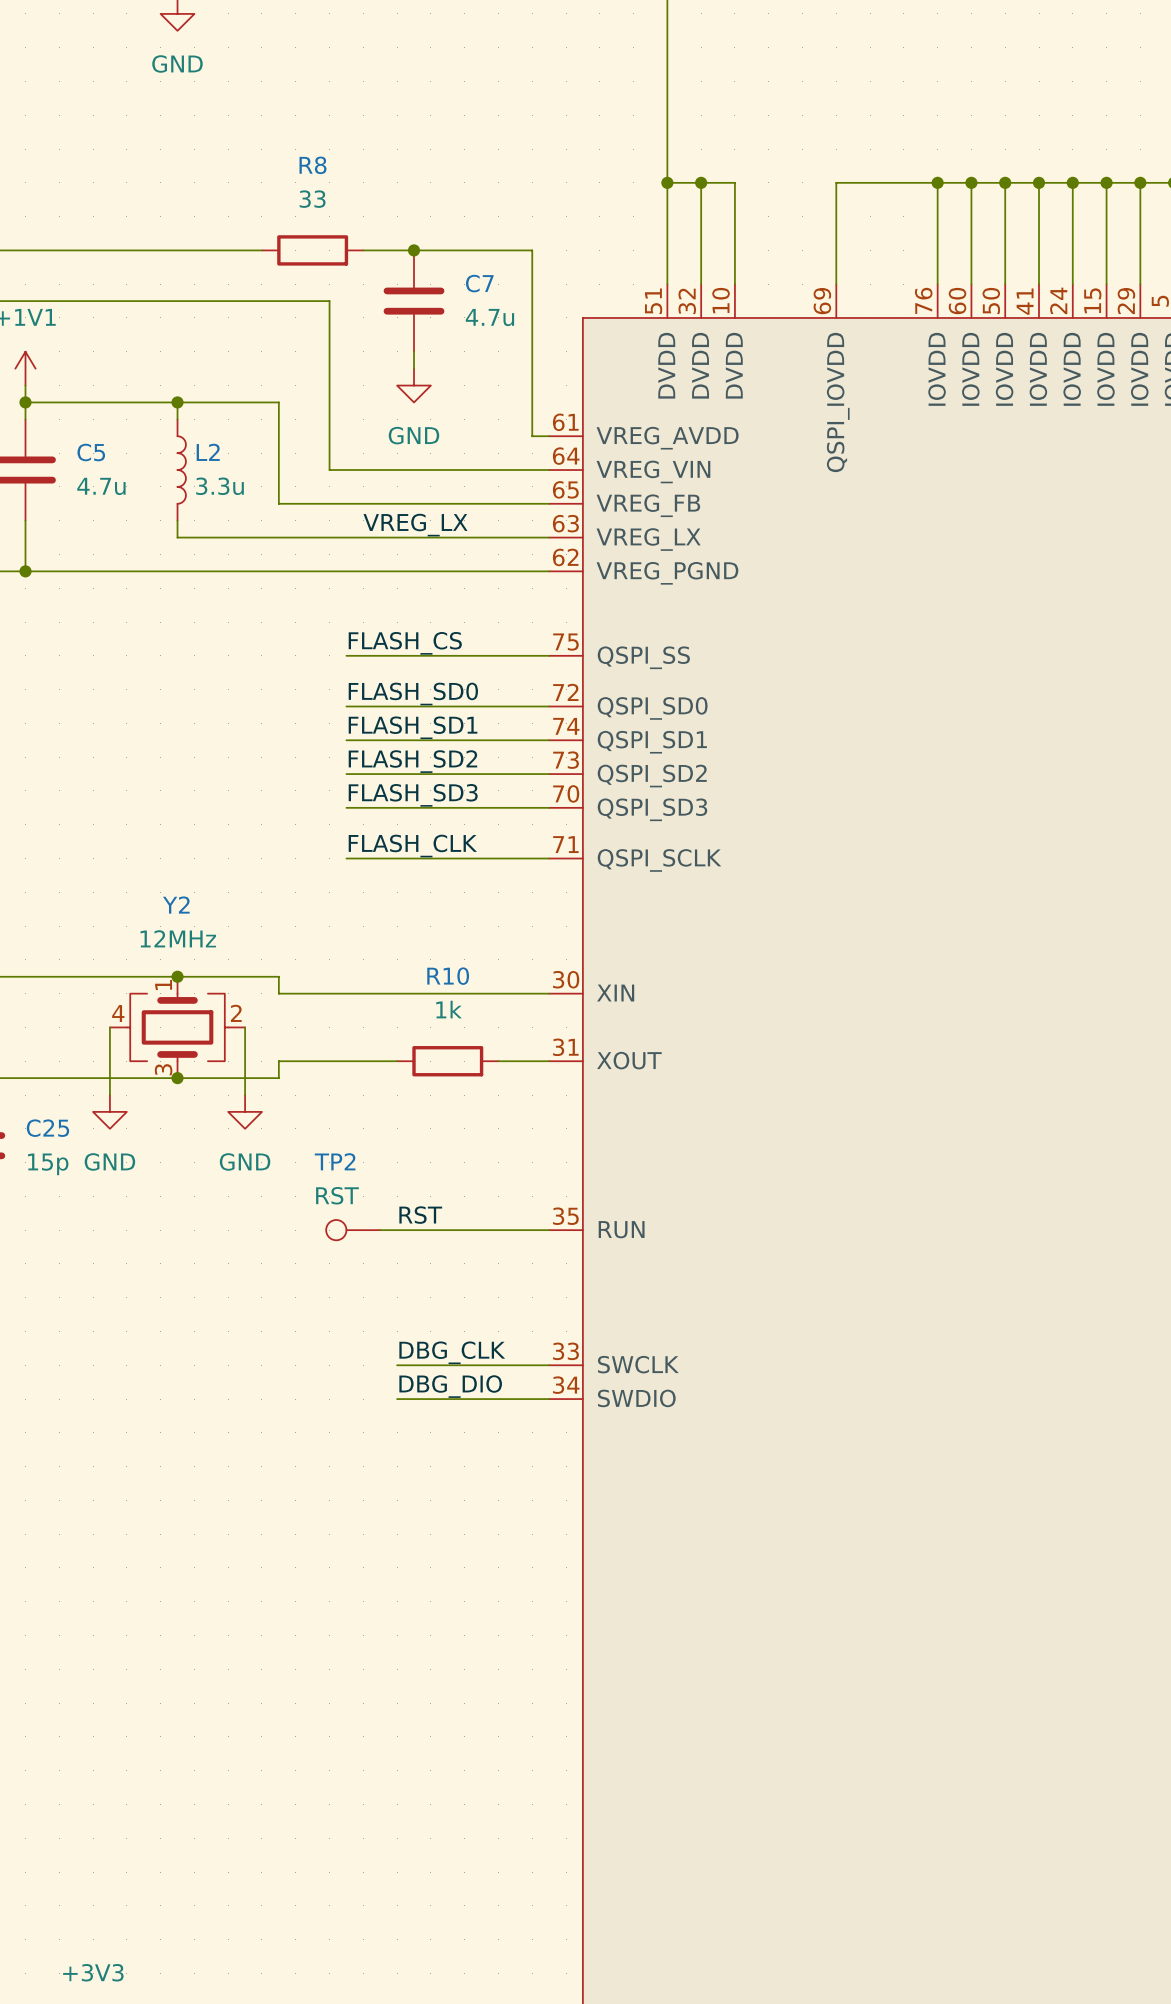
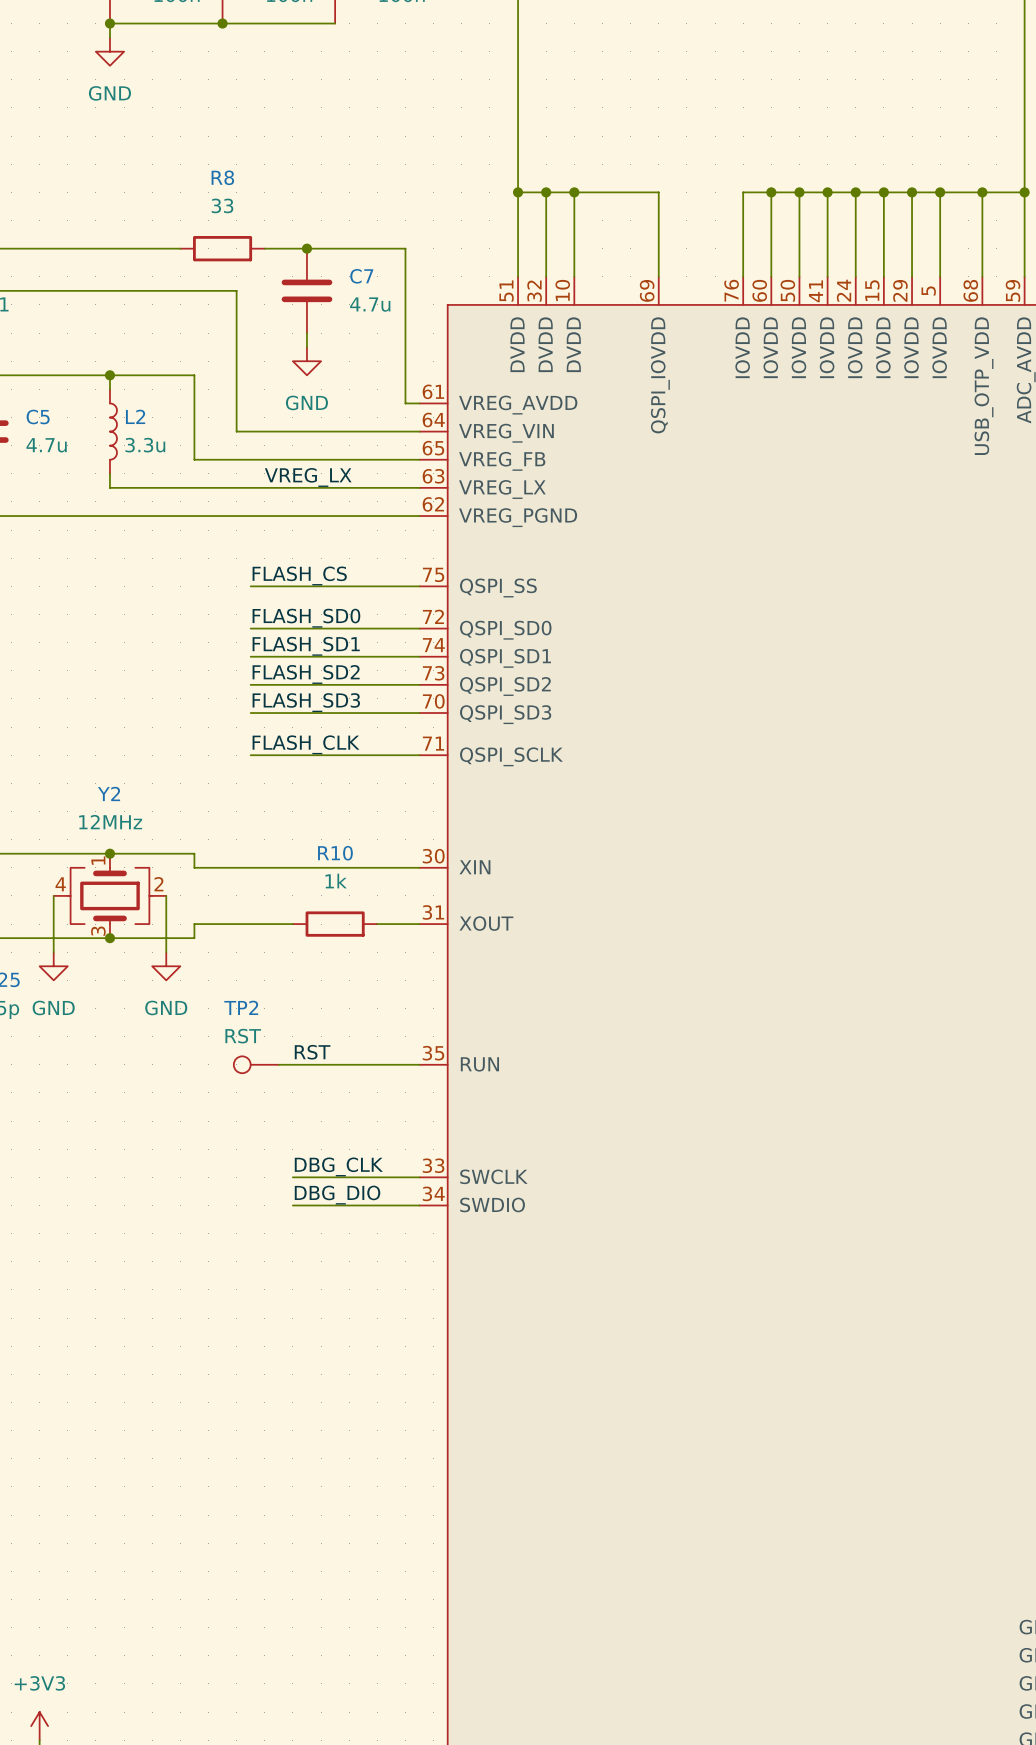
junction: none -> (574, 192)
wire: (836, 182) (937, 182) -> (658, 192) (574, 192)
junction: (937, 182) -> none

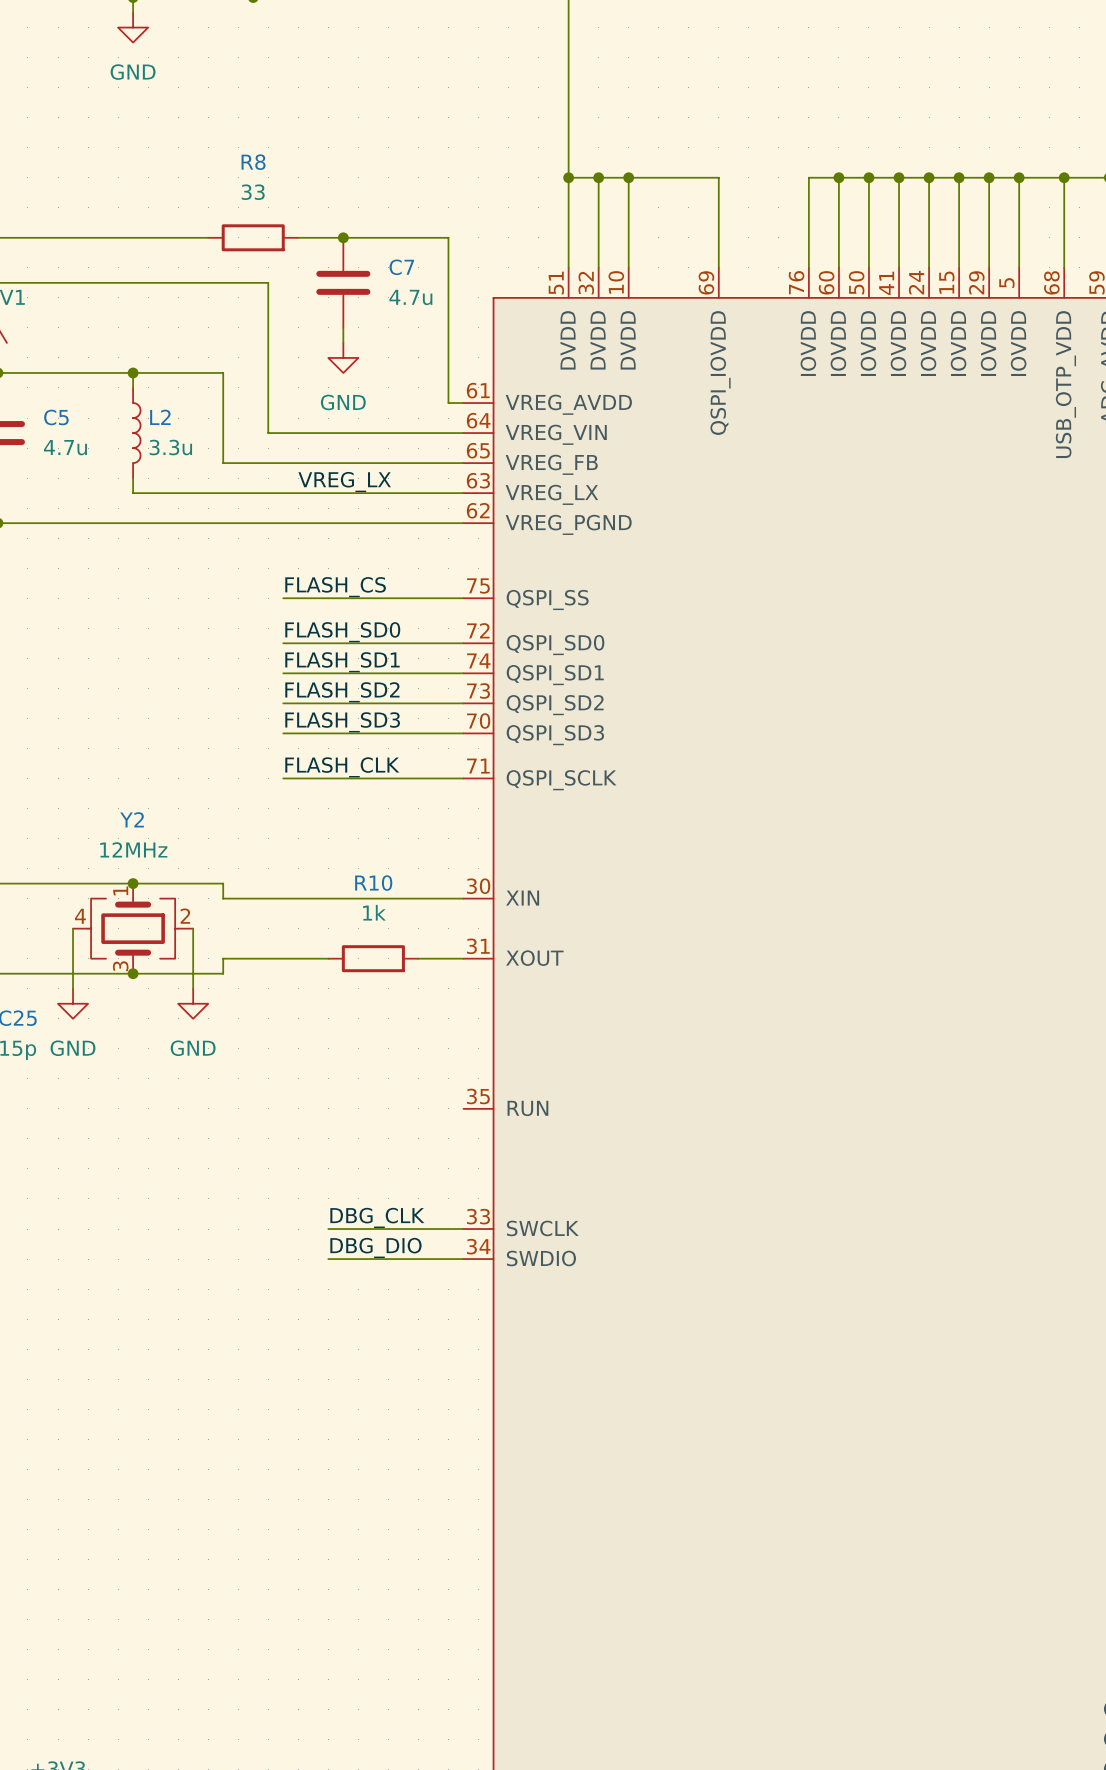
label: RST (312, 1052) -> none
TP2: RST (256, 1064) -> none
wire: (278, 1064) (419, 1064) -> none

